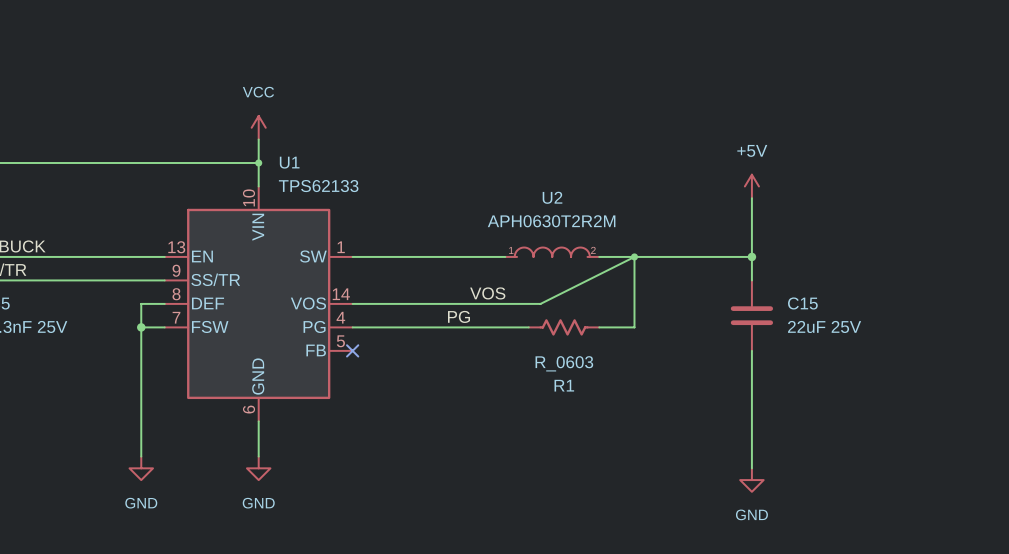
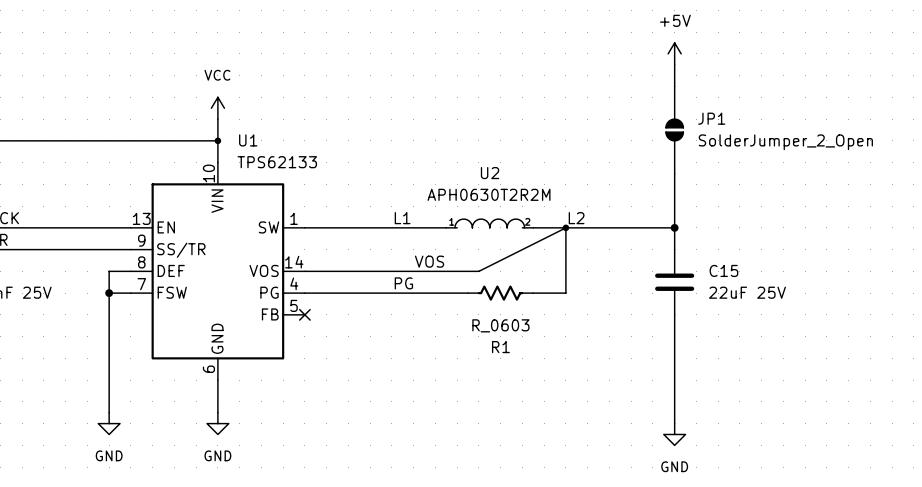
wire: none -> (674, 64) (674, 86)
JP1: none -> SolderJumper_2_Open (674, 129)
power symbol position: +5V (751, 186) -> +5V (674, 53)
label: none -> L1 (402, 218)
label: none -> L2 (576, 218)

